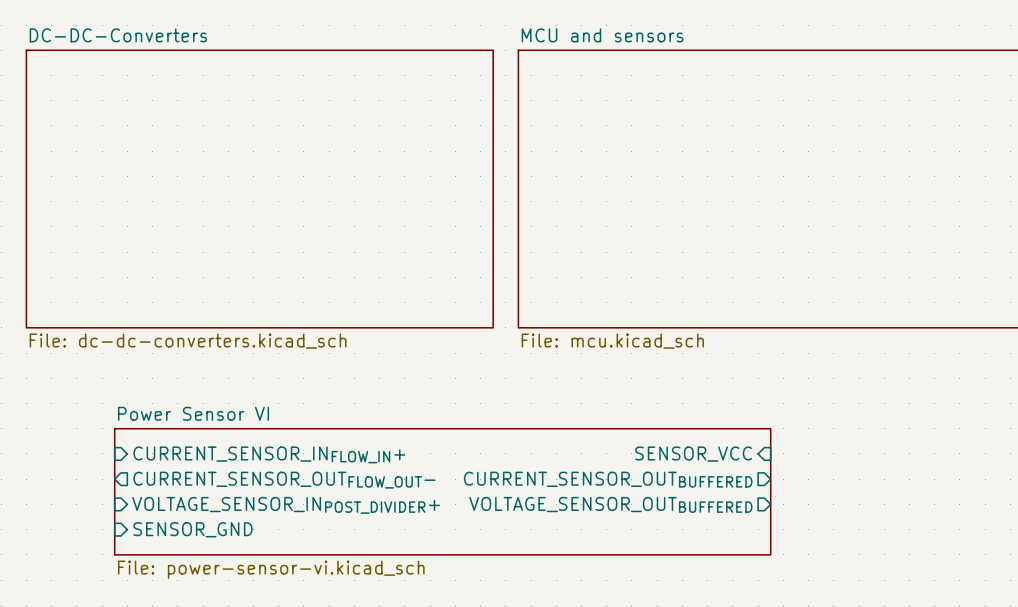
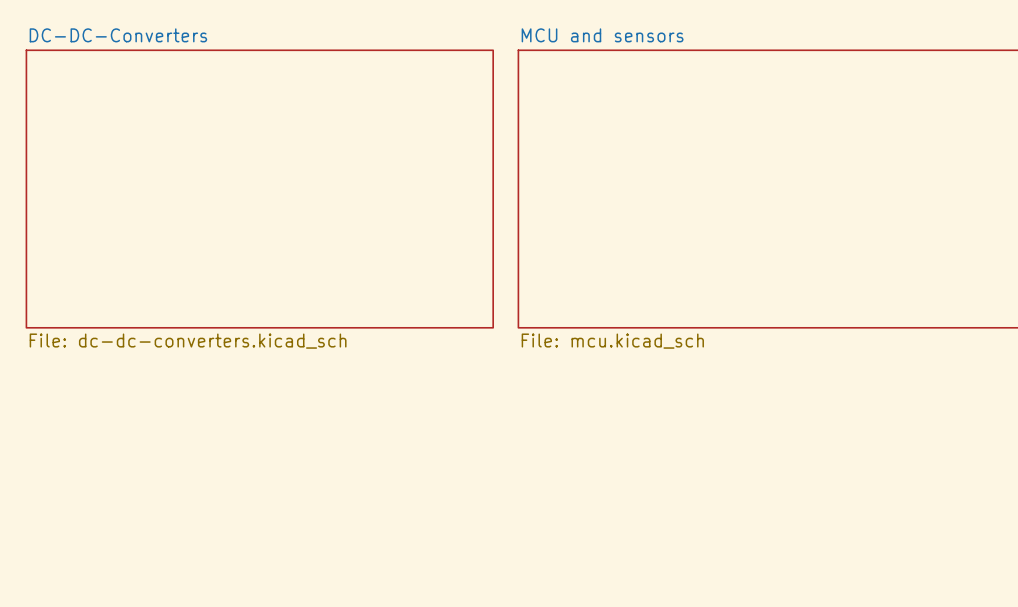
sheet pin: CURRENT_SENSOR_INFLOW_IN+ (269, 454) -> none
sheet pin: SENSOR_VCC (693, 454) -> none
sheet pin: CURRENT_SENSOR_OUTBUFFERED (608, 479) -> none
sheet pin: CURRENT_SENSOR_OUTFLOW_OUT- (284, 480) -> none
sheet Power Sensor VI: File: power-sensor-vi.kicad_sch (442, 491) -> none
sheet pin: VOLTAGE_SENSOR_OUTBUFFERED (610, 504) -> none
sheet pin: VOLTAGE_SENSOR_INPOST_DIVIDER+ (286, 505) -> none
sheet pin: SENSOR_GND (193, 529) -> none

